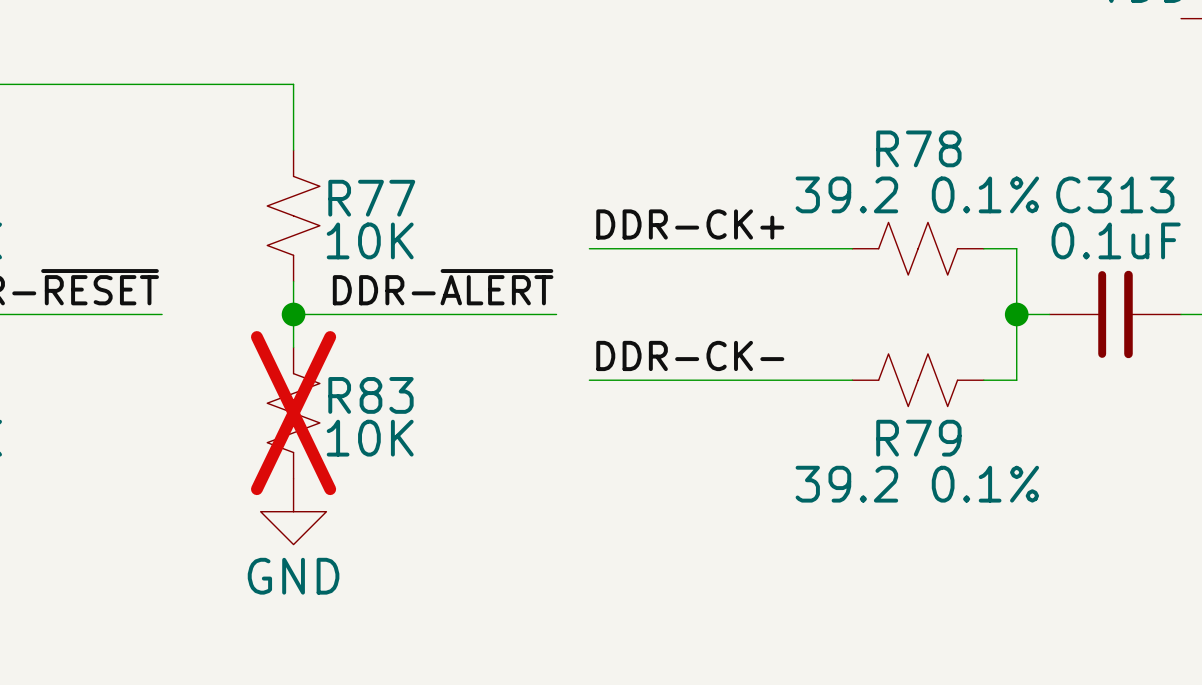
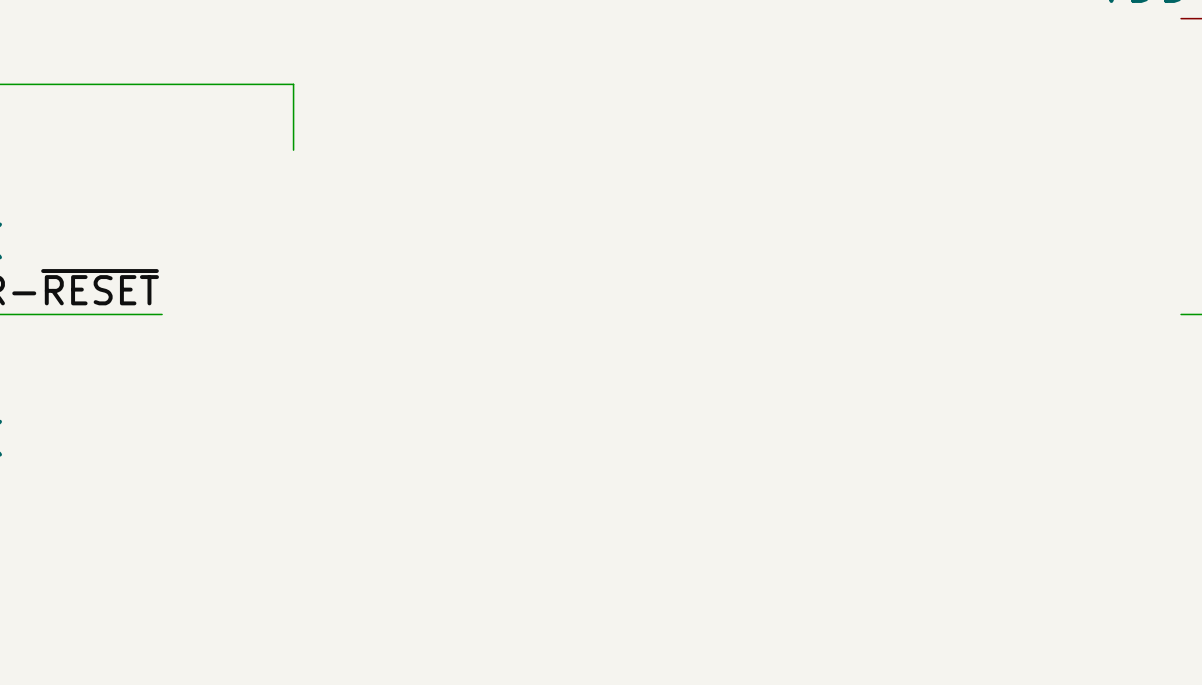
R77: 10K (293, 215) -> none
label: DDR-CK+ (690, 224) -> none
wire: (589, 248) (852, 248) -> none
R78: 39.2 0.1% (918, 248) -> none
wire: (983, 248) (1016, 248) (1016, 380) (983, 380) -> none
wire: (293, 281) (293, 347) -> none
label: DDR-~{ALERT} (443, 287) -> none
wire: (293, 314) (556, 314) -> none
junction: (293, 314) -> none
wire: (1016, 314) (1049, 314) -> none
junction: (1016, 314) -> none
C313: 0.1uF (1115, 314) -> none
label: DDR-CK- (690, 355) -> none
wire: (589, 380) (852, 380) -> none
R79: 39.2 0.1% (918, 380) -> none
R83: 10K (293, 413) -> none
power symbol: GND (293, 511) -> none

